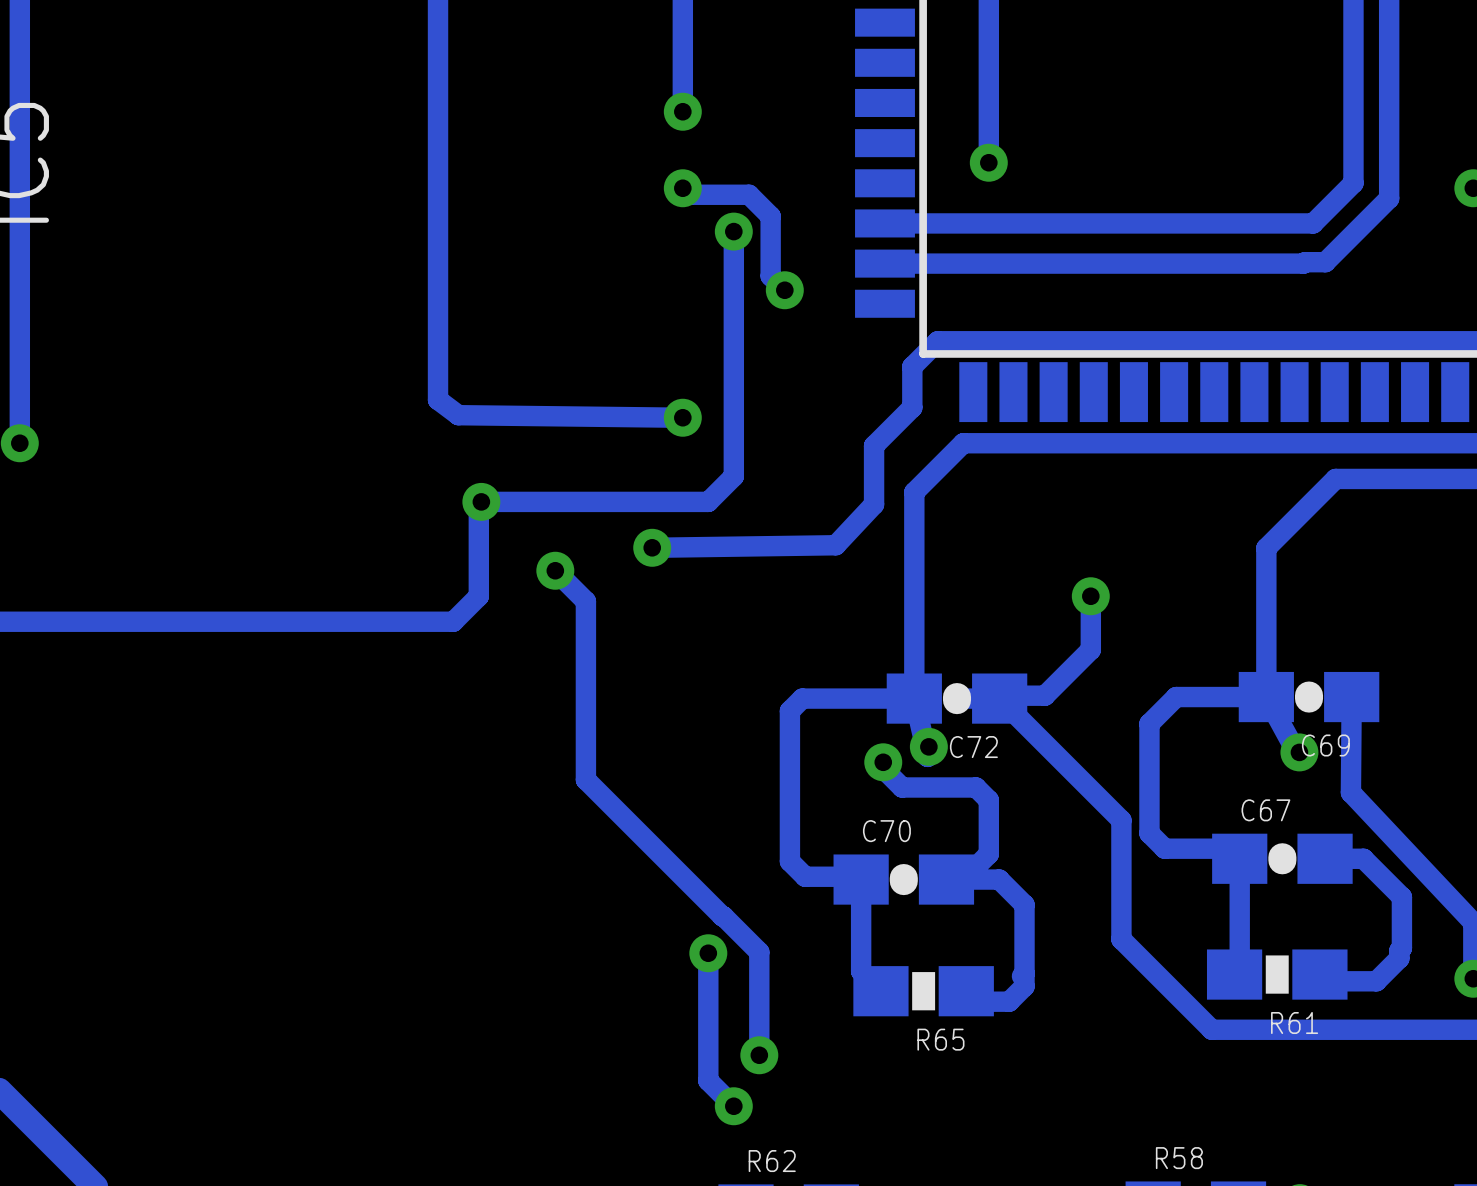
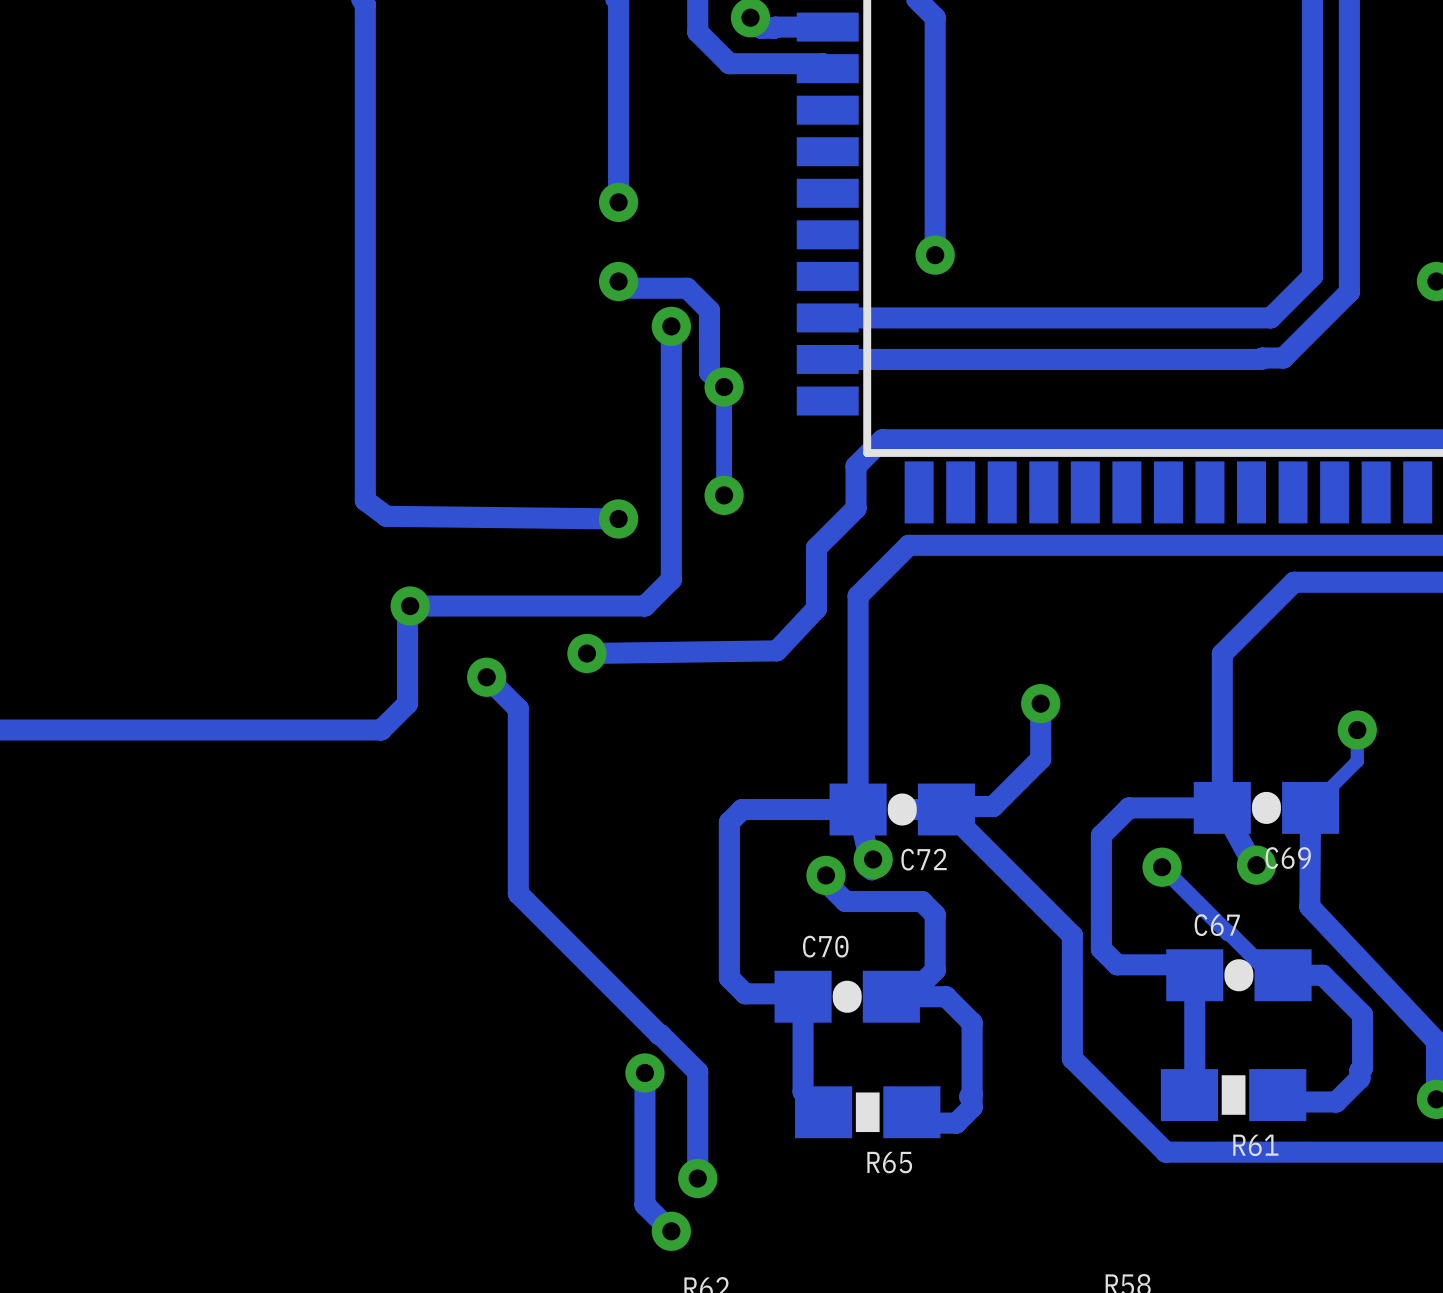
track: none -> (724, 387) (724, 495)
via: none -> (724, 495)
track: none -> (1357, 730) (1357, 761) (1310, 807)
via: none -> (1357, 730)
track: none -> (1162, 867) (1271, 975) (1283, 975)
via: none -> (1162, 867)

